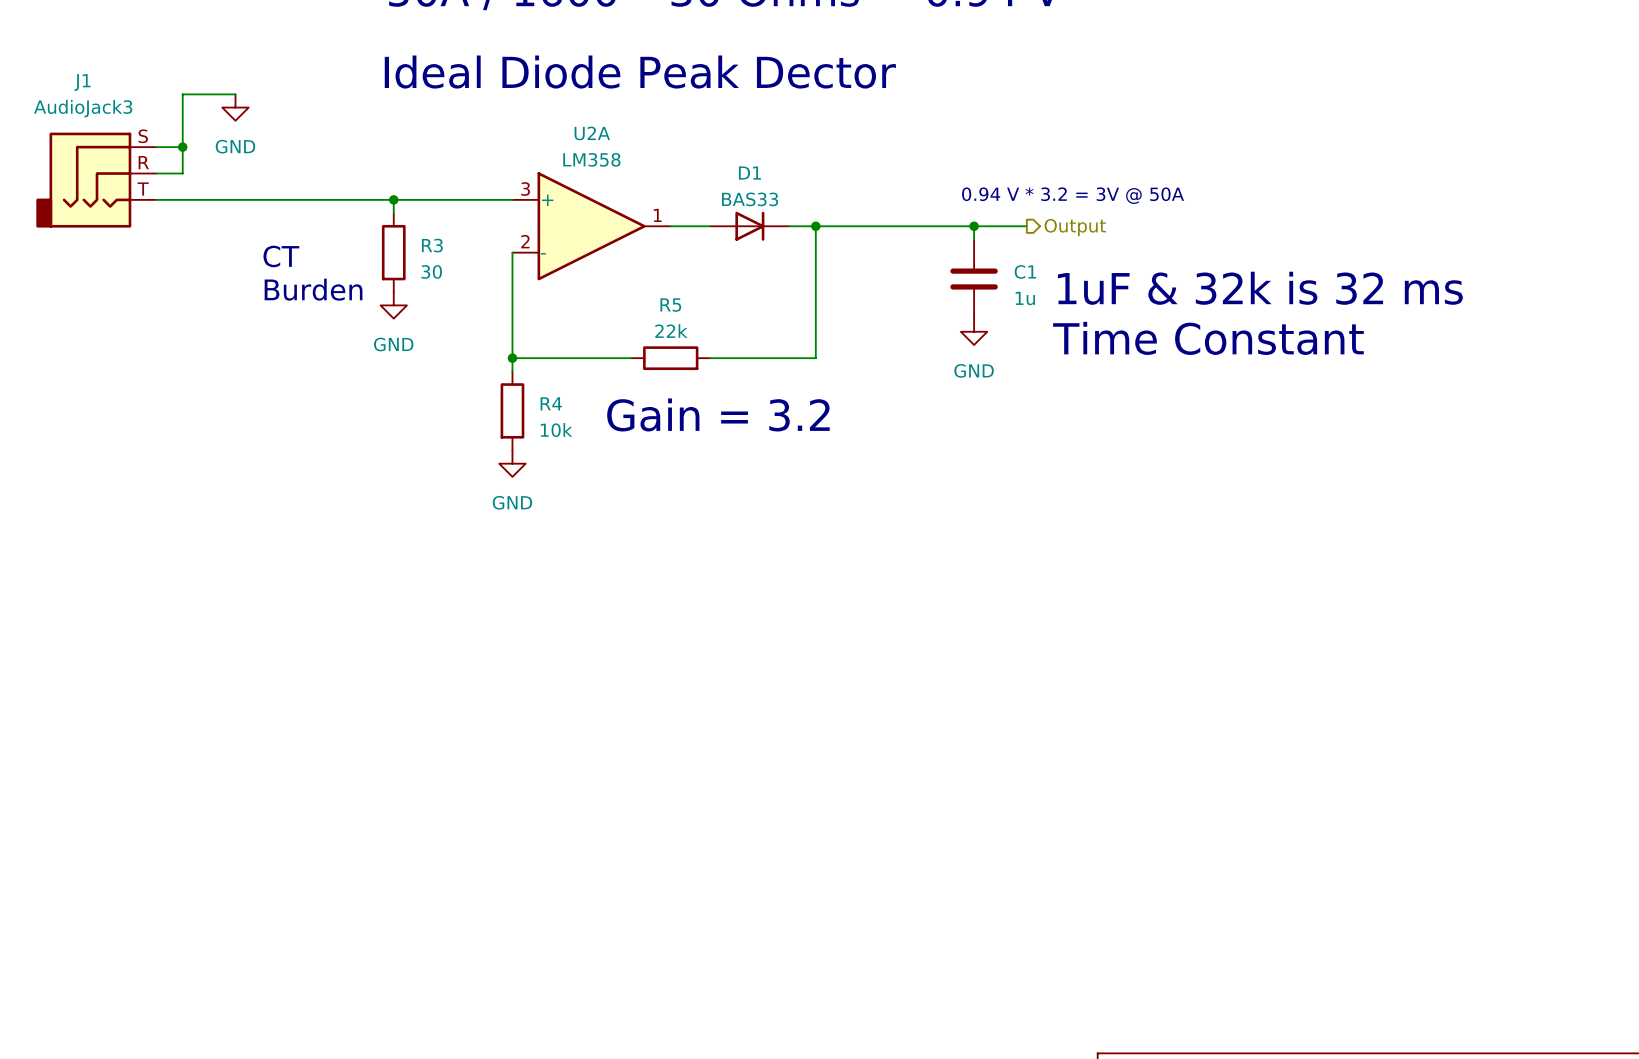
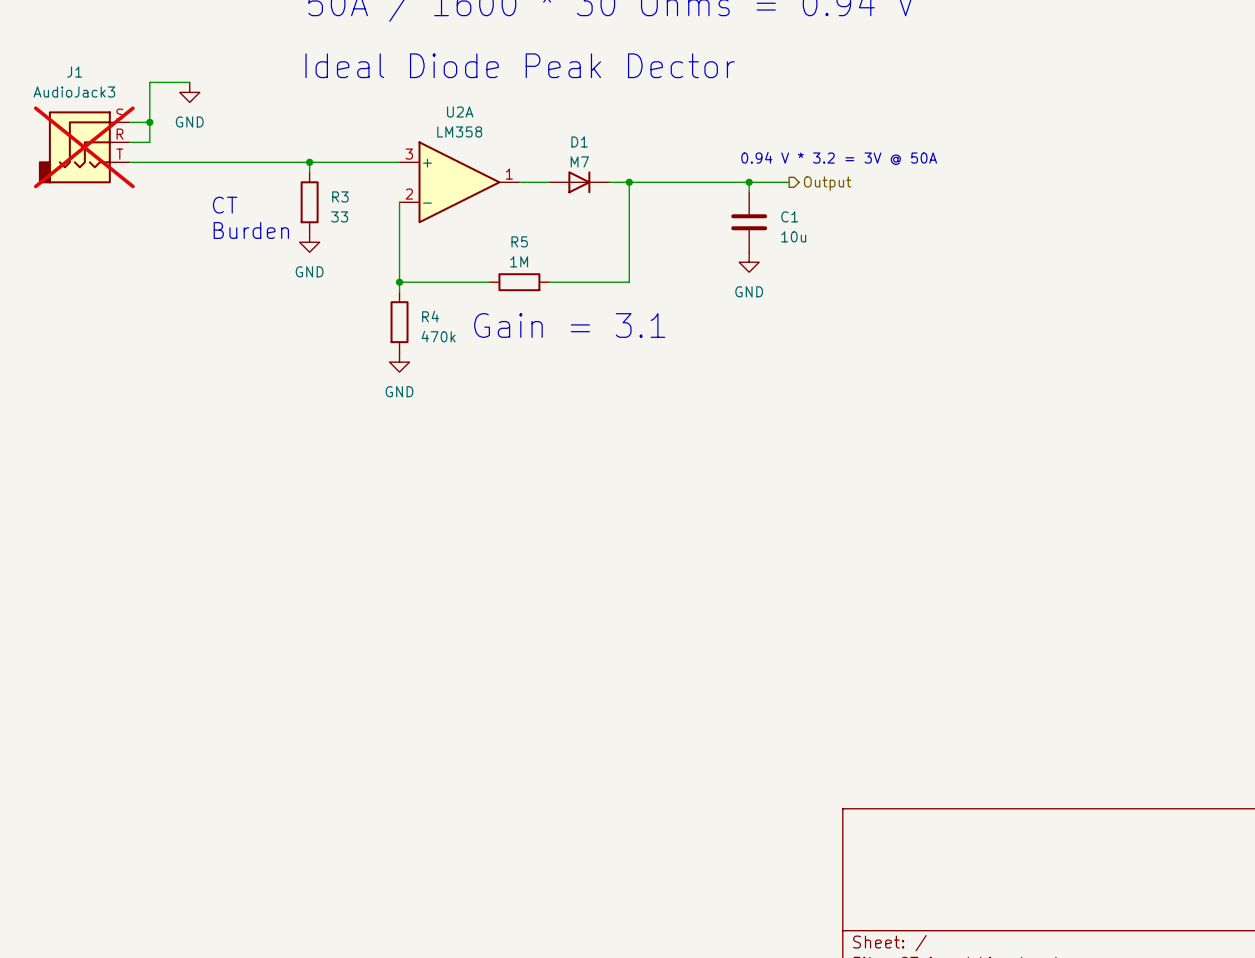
J1 do-not-place cross: none -> (84, 147)
D1 value: BAS33 (750, 199) -> M7 (579, 161)
R3 value: 30 (431, 271) -> 33 (339, 216)
text: 1uF & 32k is 32 ms (1260, 288) -> none
C1 value: 1u (1025, 298) -> 10u (793, 236)
R5 value: 22k (671, 331) -> 1M (519, 261)
text: Time Constant (1208, 338) -> none
text: Gain = 3.2 (718, 414) -> Gain = 3.1 (569, 325)
R4 value: 10k (556, 430) -> 470k (438, 336)

